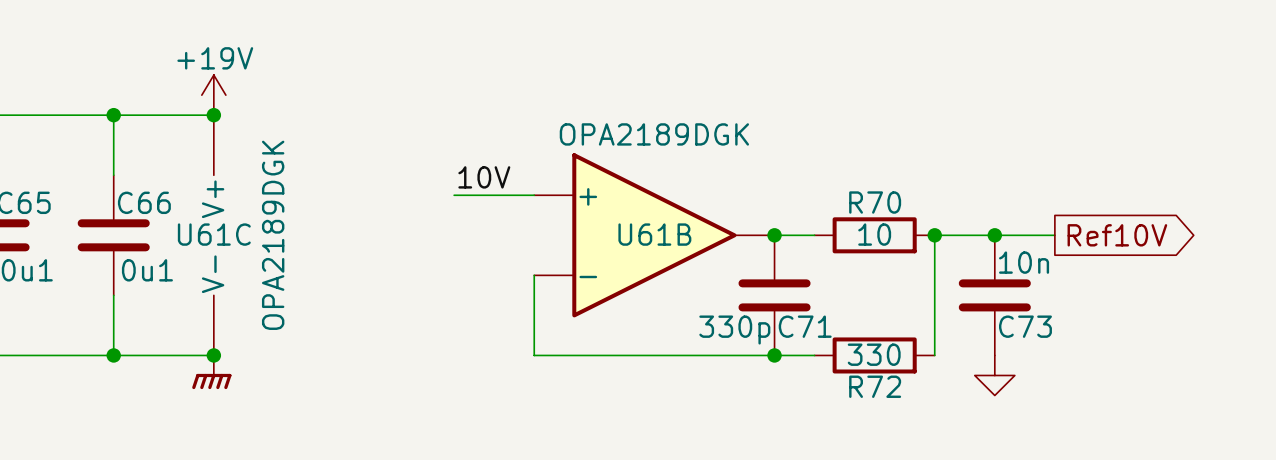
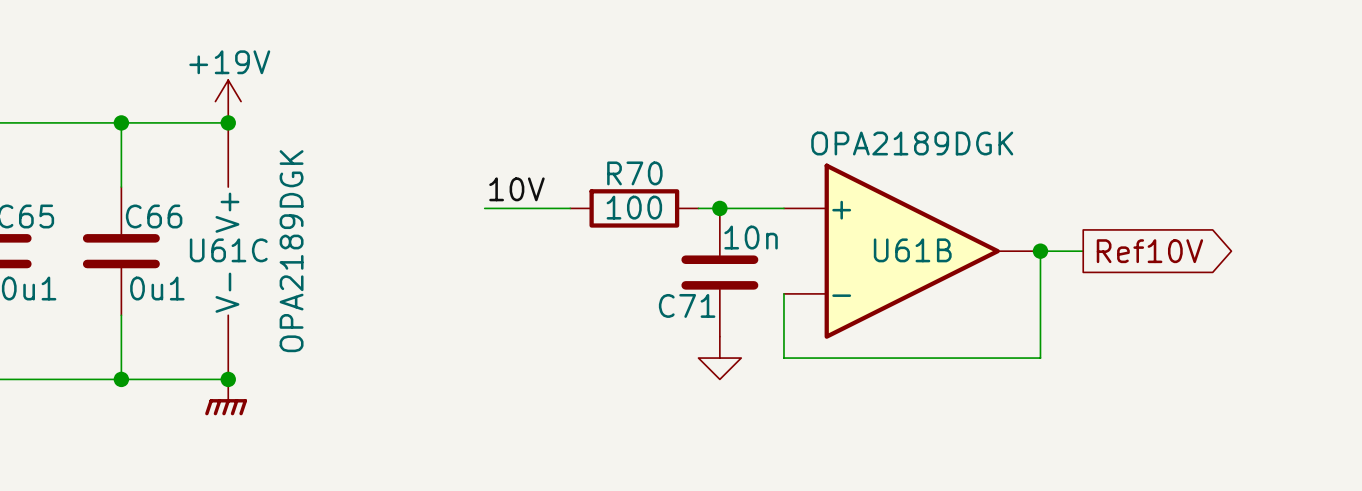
wire: none -> (698, 208) (783, 208)
junction: none -> (719, 208)
R70 value: 10 (874, 234) -> 100 (634, 207)
U61B position: (654, 235) -> (912, 251)
junction: (774, 235) -> none
R70 position: (874, 235) -> (634, 208)
junction: (934, 235) -> none
wire: (974, 235) (934, 235) (934, 355) -> (1040, 251) (1040, 358) (783, 358) (783, 293)
junction: none -> (1040, 251)
junction: (994, 235) -> none
wire: (1014, 235) (1054, 235) -> none
global label position: Ref10V (1117, 235) -> Ref10V (1149, 251)
wire: (534, 275) (534, 355) (814, 355) -> none
C71 position: (774, 295) -> (719, 272)
C73: 10n (994, 295) -> none
C71 name position: C71 (805, 326) -> C71 (687, 305)
C71 value: 330p (734, 330) -> 10n (751, 237)
junction: (774, 355) -> none
R72: 330 (874, 355) -> none
power symbol position: (994, 375) -> (719, 358)

